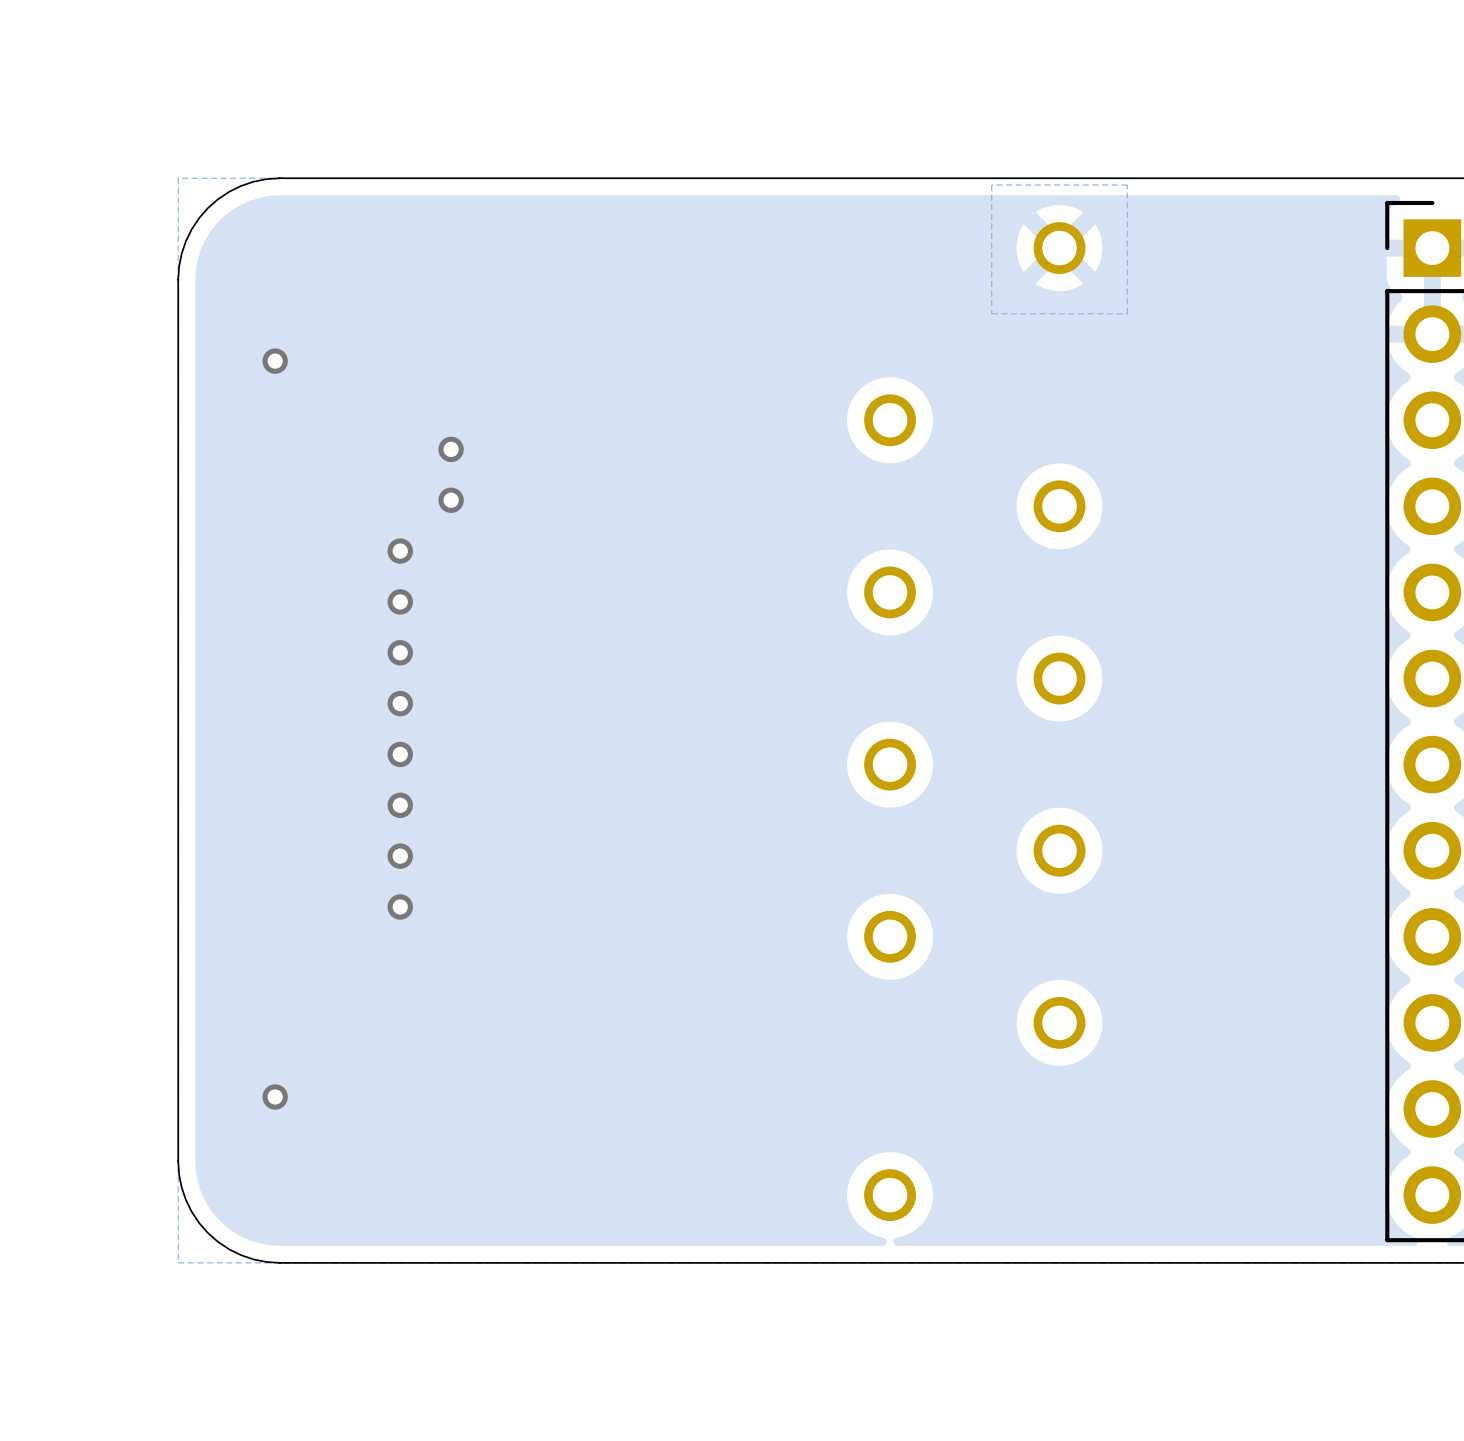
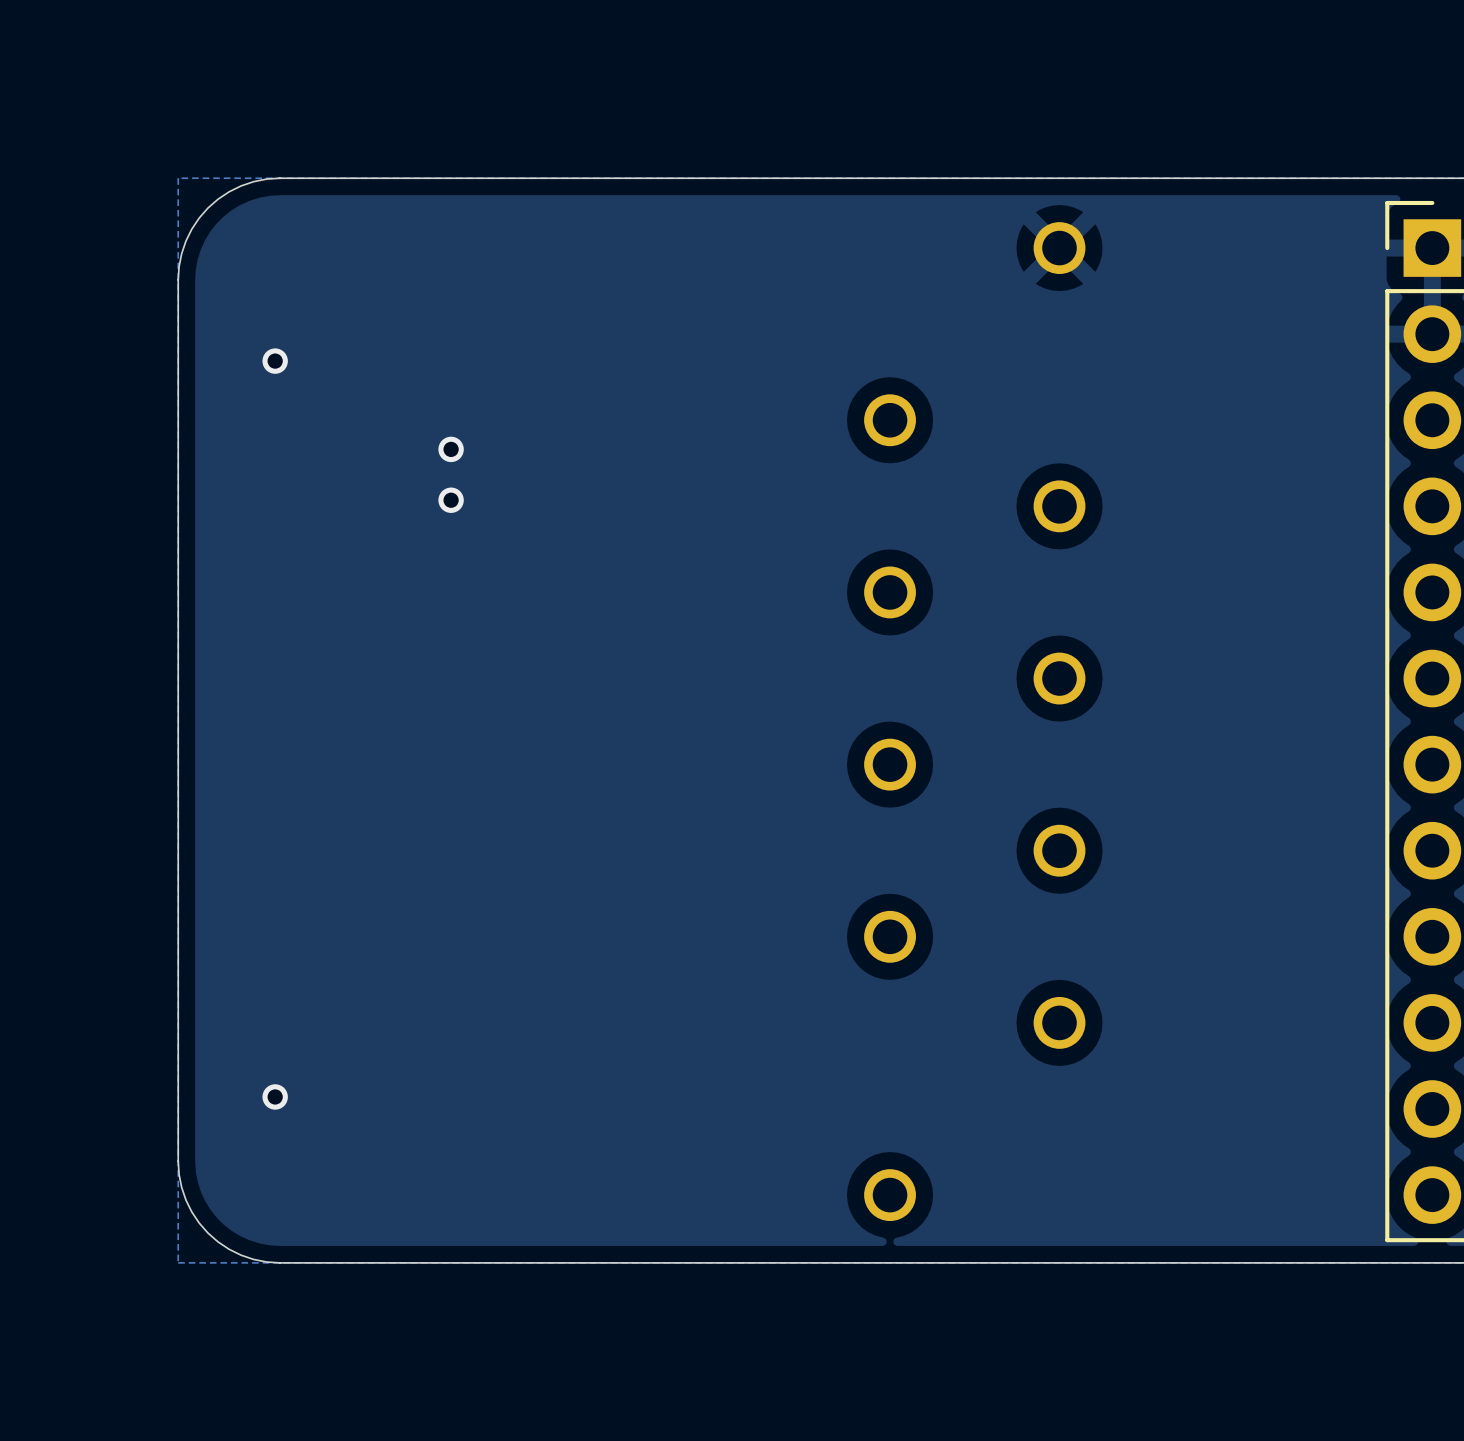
zone outline: (1127, 185) (991, 185) (991, 313) (1127, 313) (1127, 185) -> none
via: (400, 551) -> none
via: (400, 601) -> none
via: (400, 652) -> none
via: (400, 703) -> none
via: (400, 754) -> none
via: (400, 805) -> none
via: (400, 856) -> none
via: (400, 906) -> none

